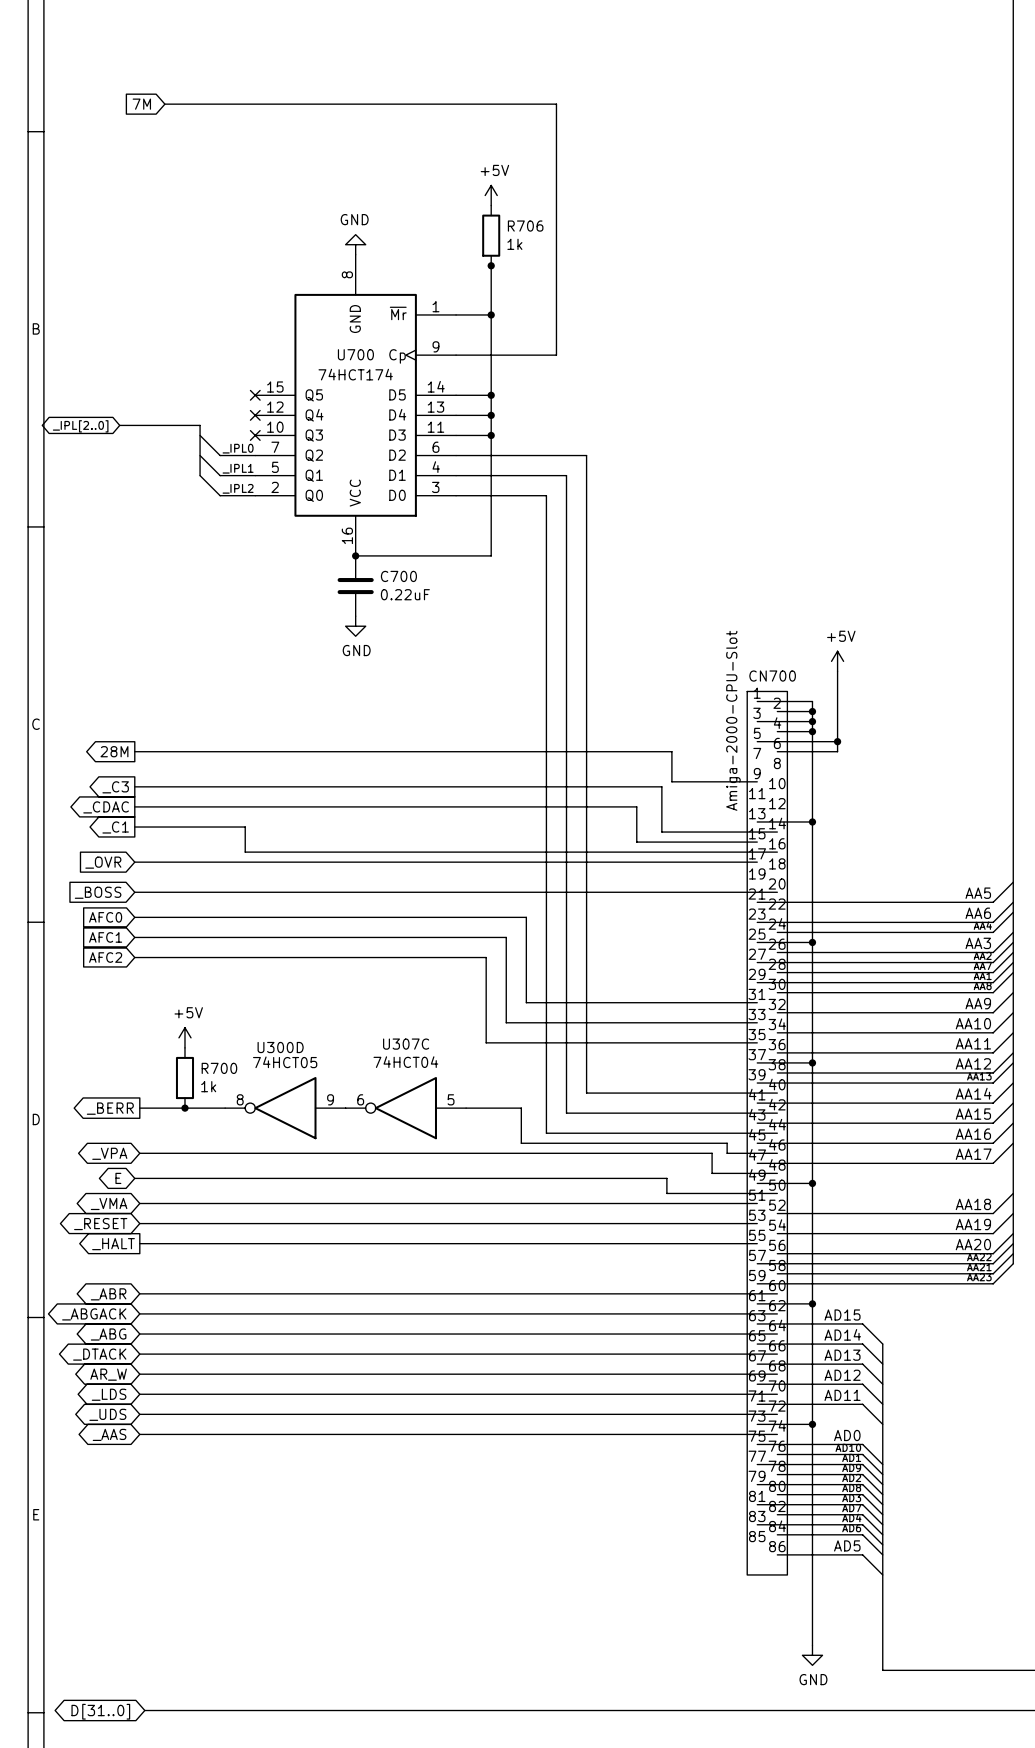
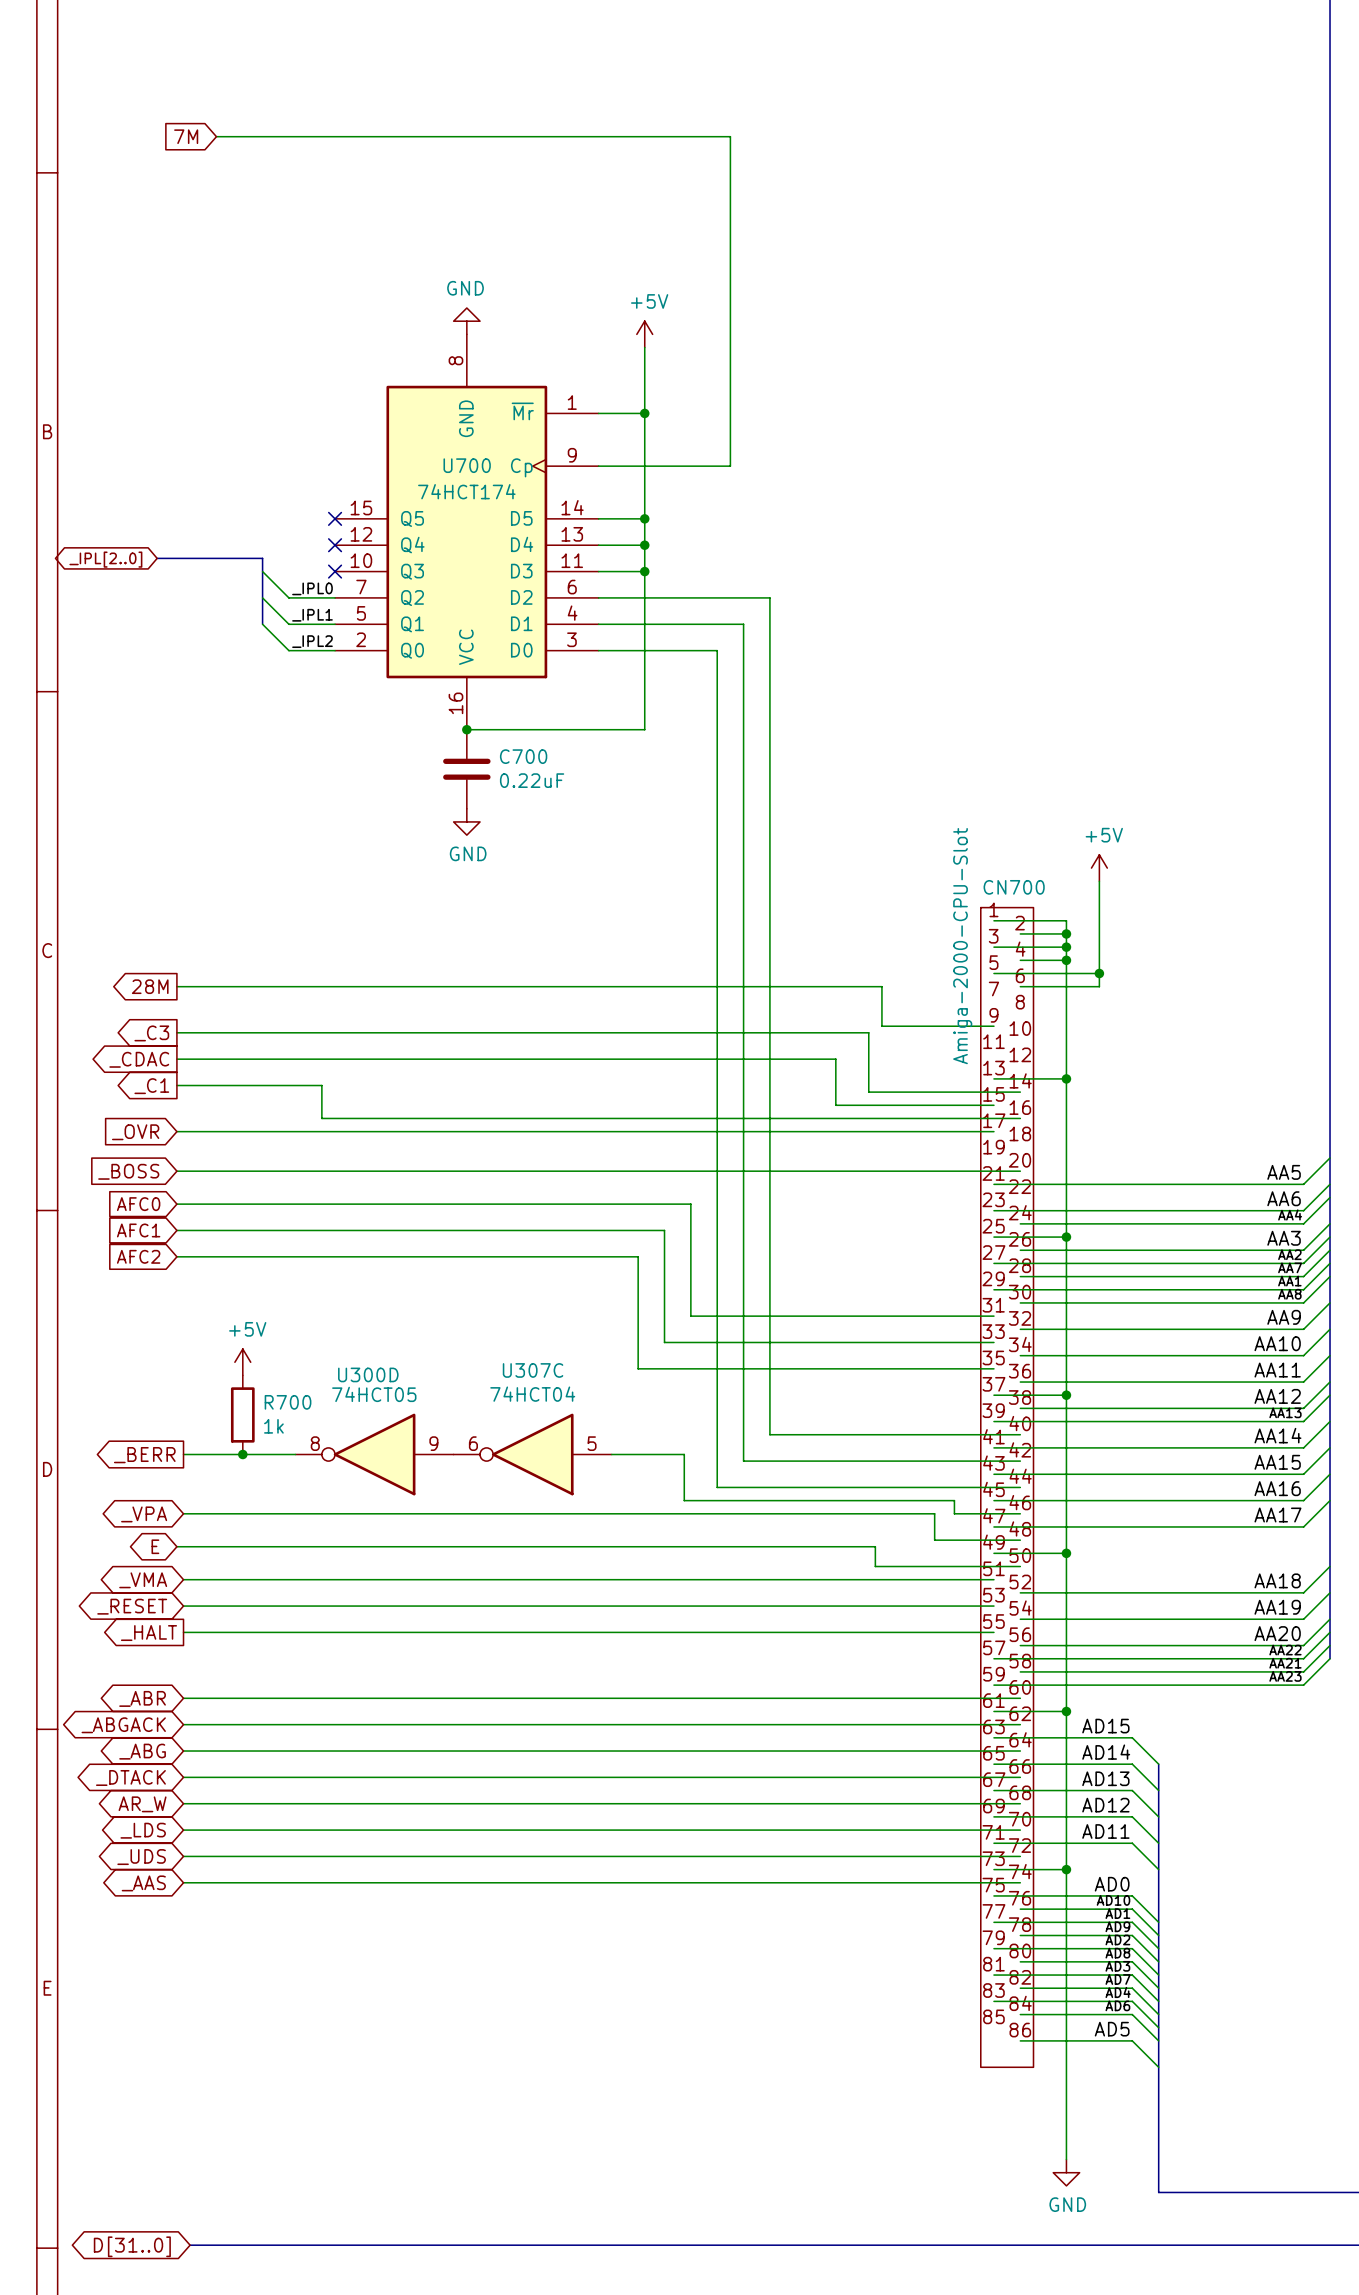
power symbol position: +5V (491, 195) -> +5V (644, 334)
R706: 1k (491, 235) -> none
junction: (491, 265) -> none

